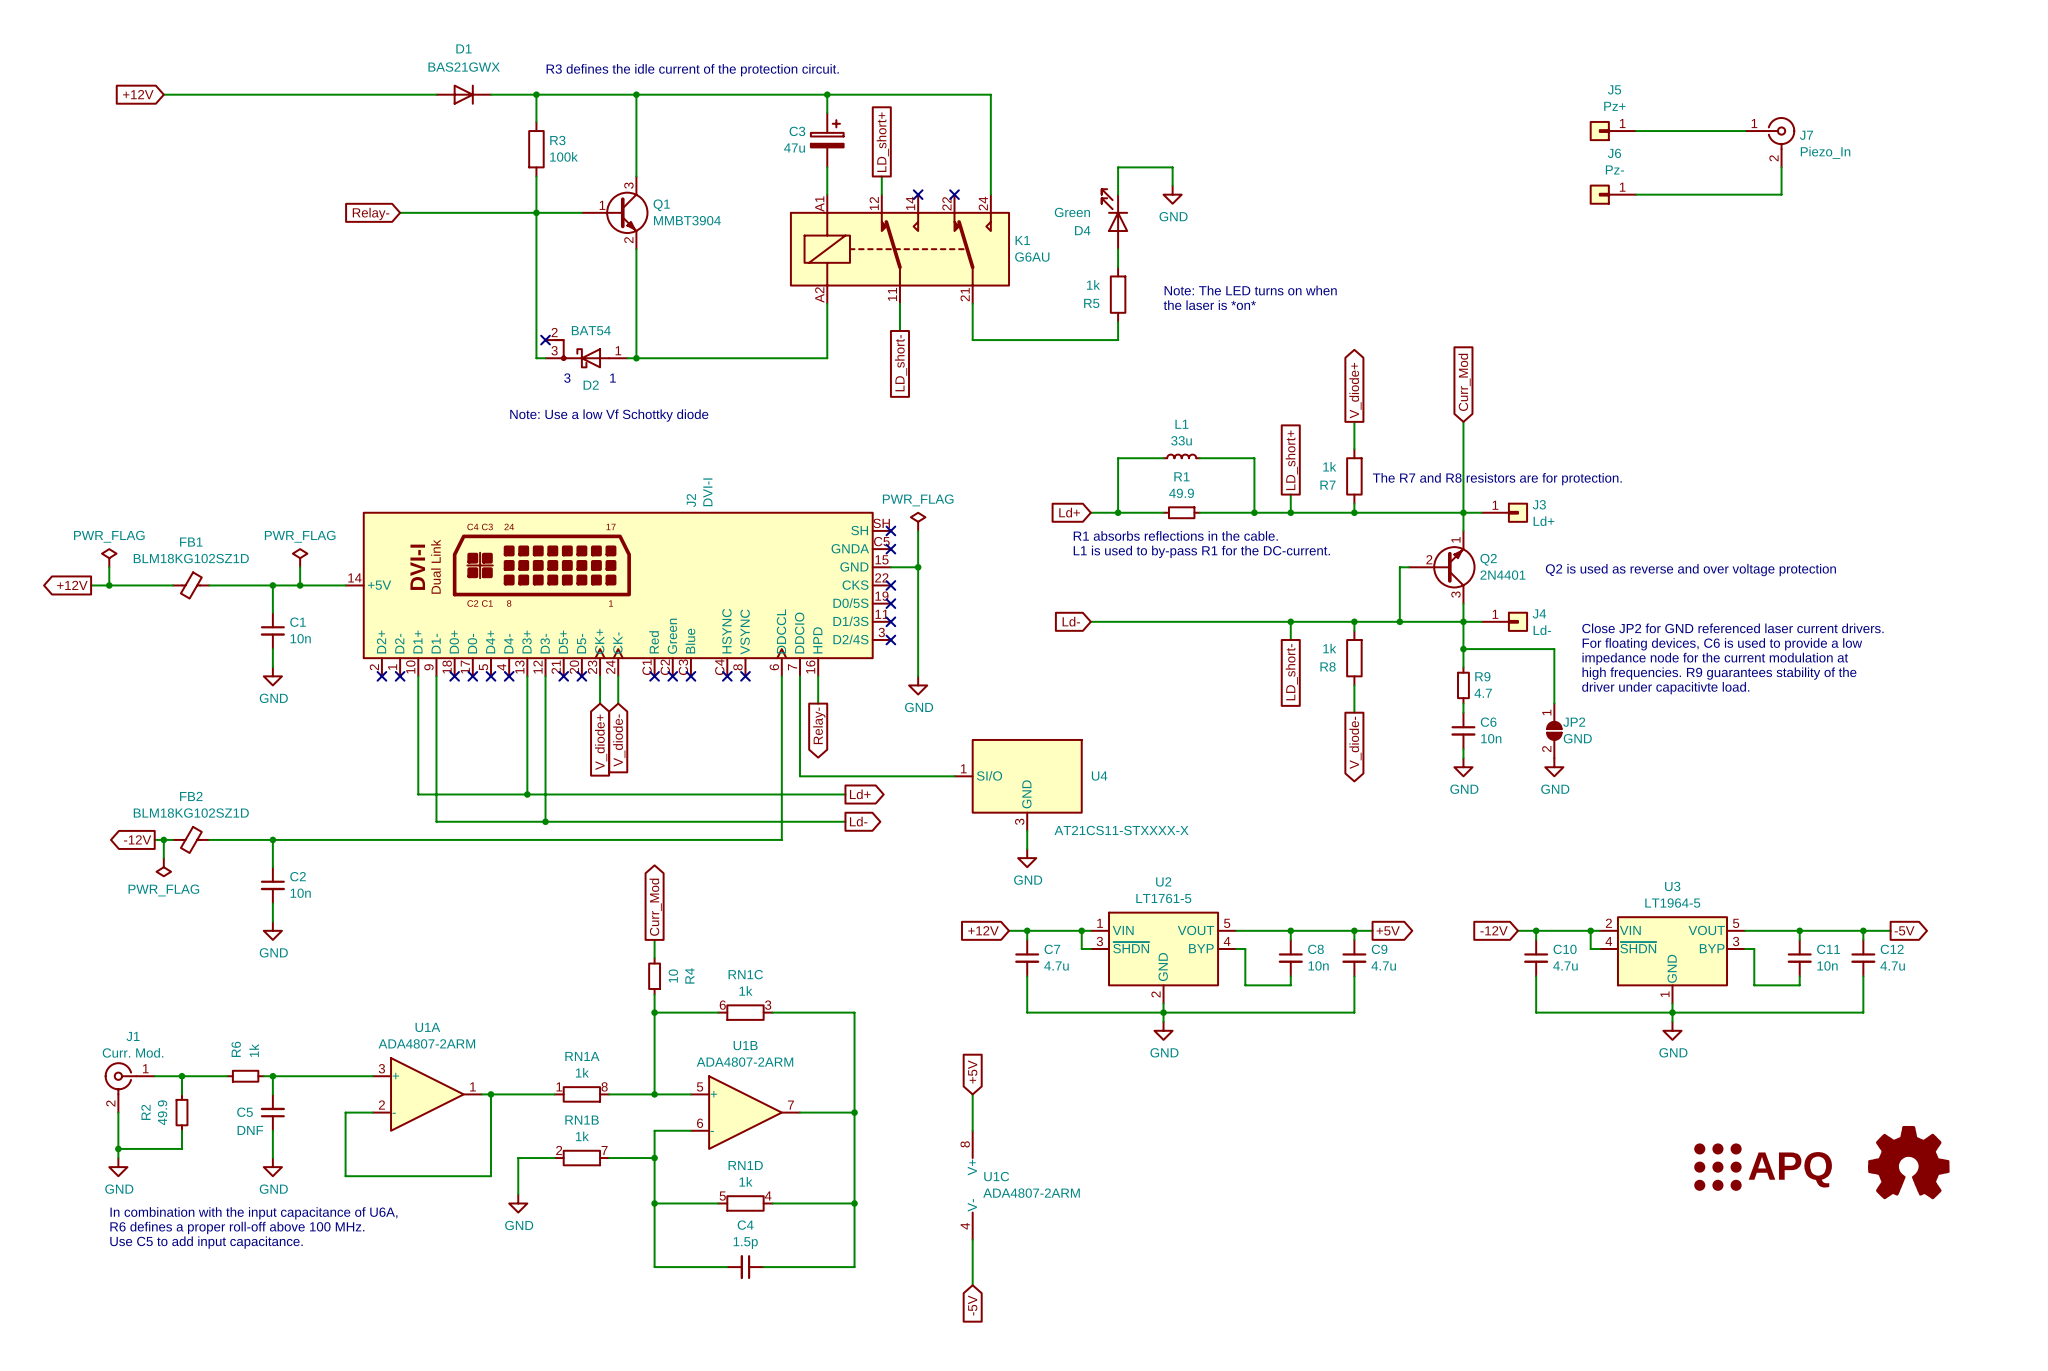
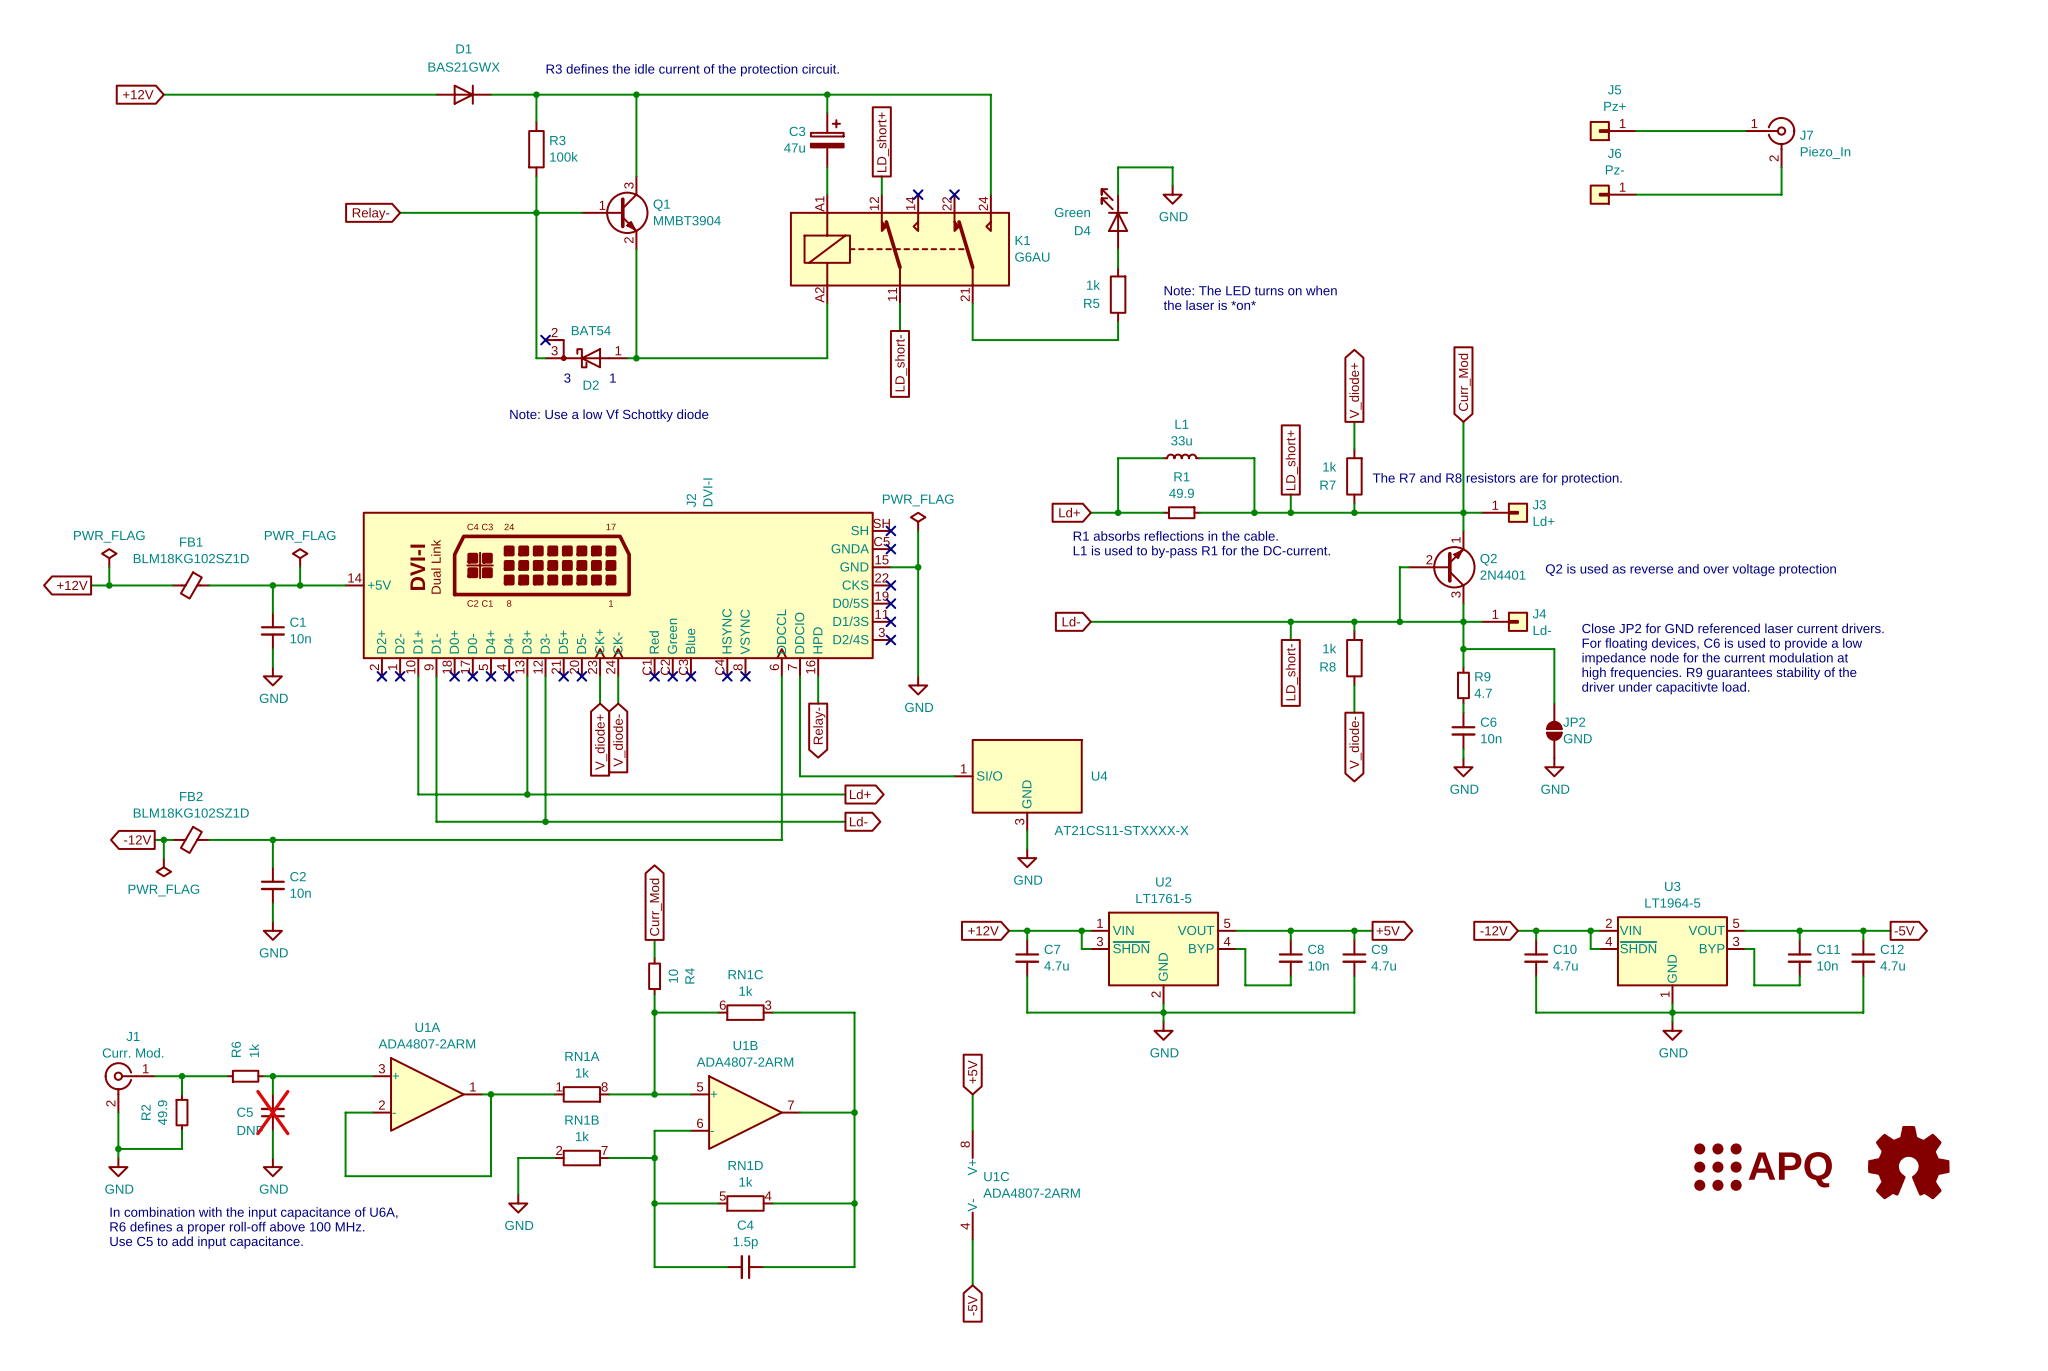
JP2 pin number: 1 (1546, 712) -> none
JP2 pin number: 2 (1546, 749) -> none
C5 do-not-place cross: none -> (272, 1112)

